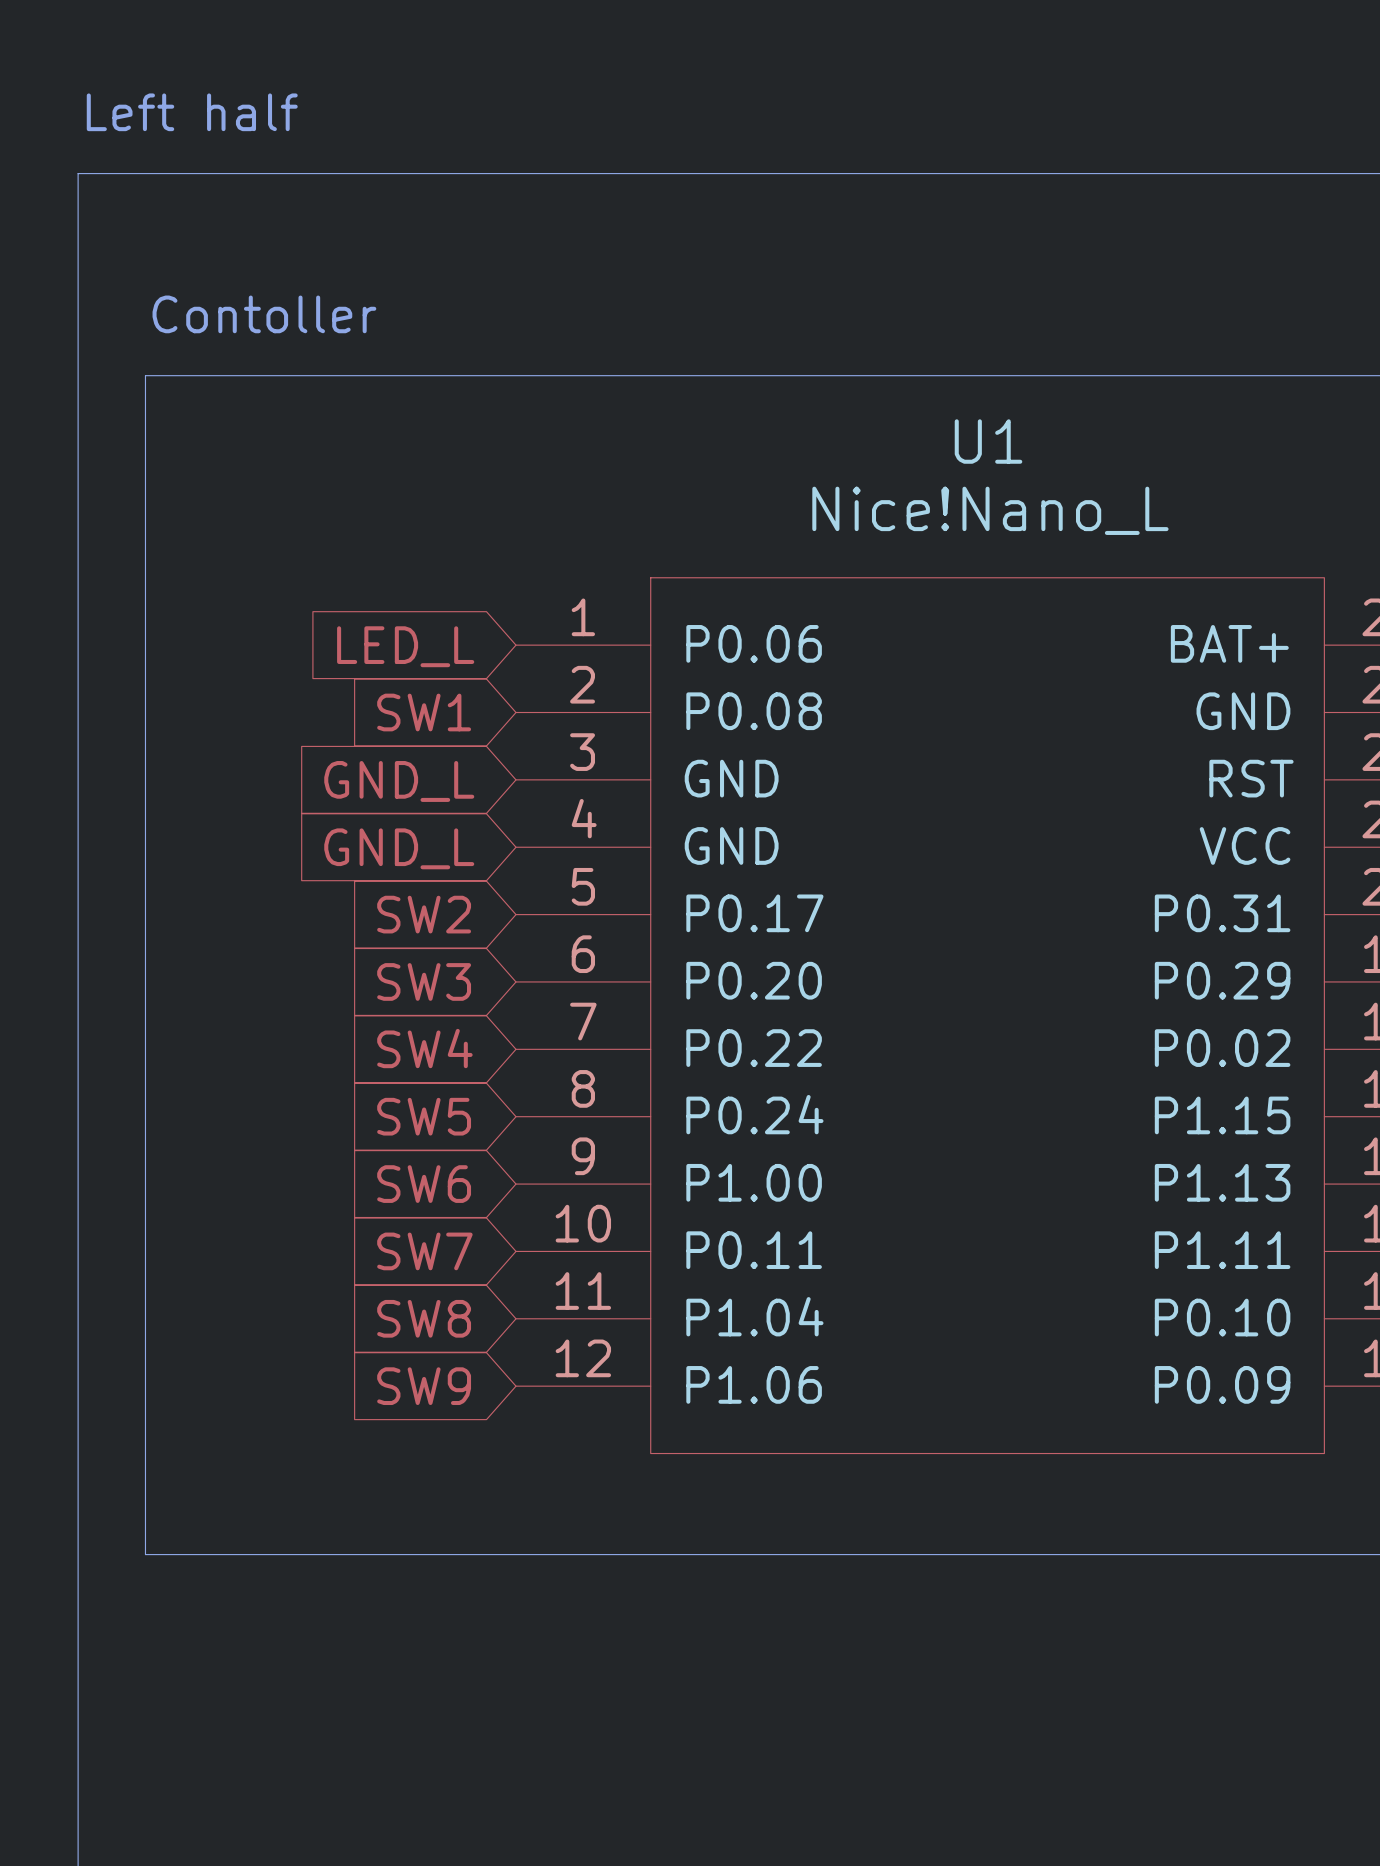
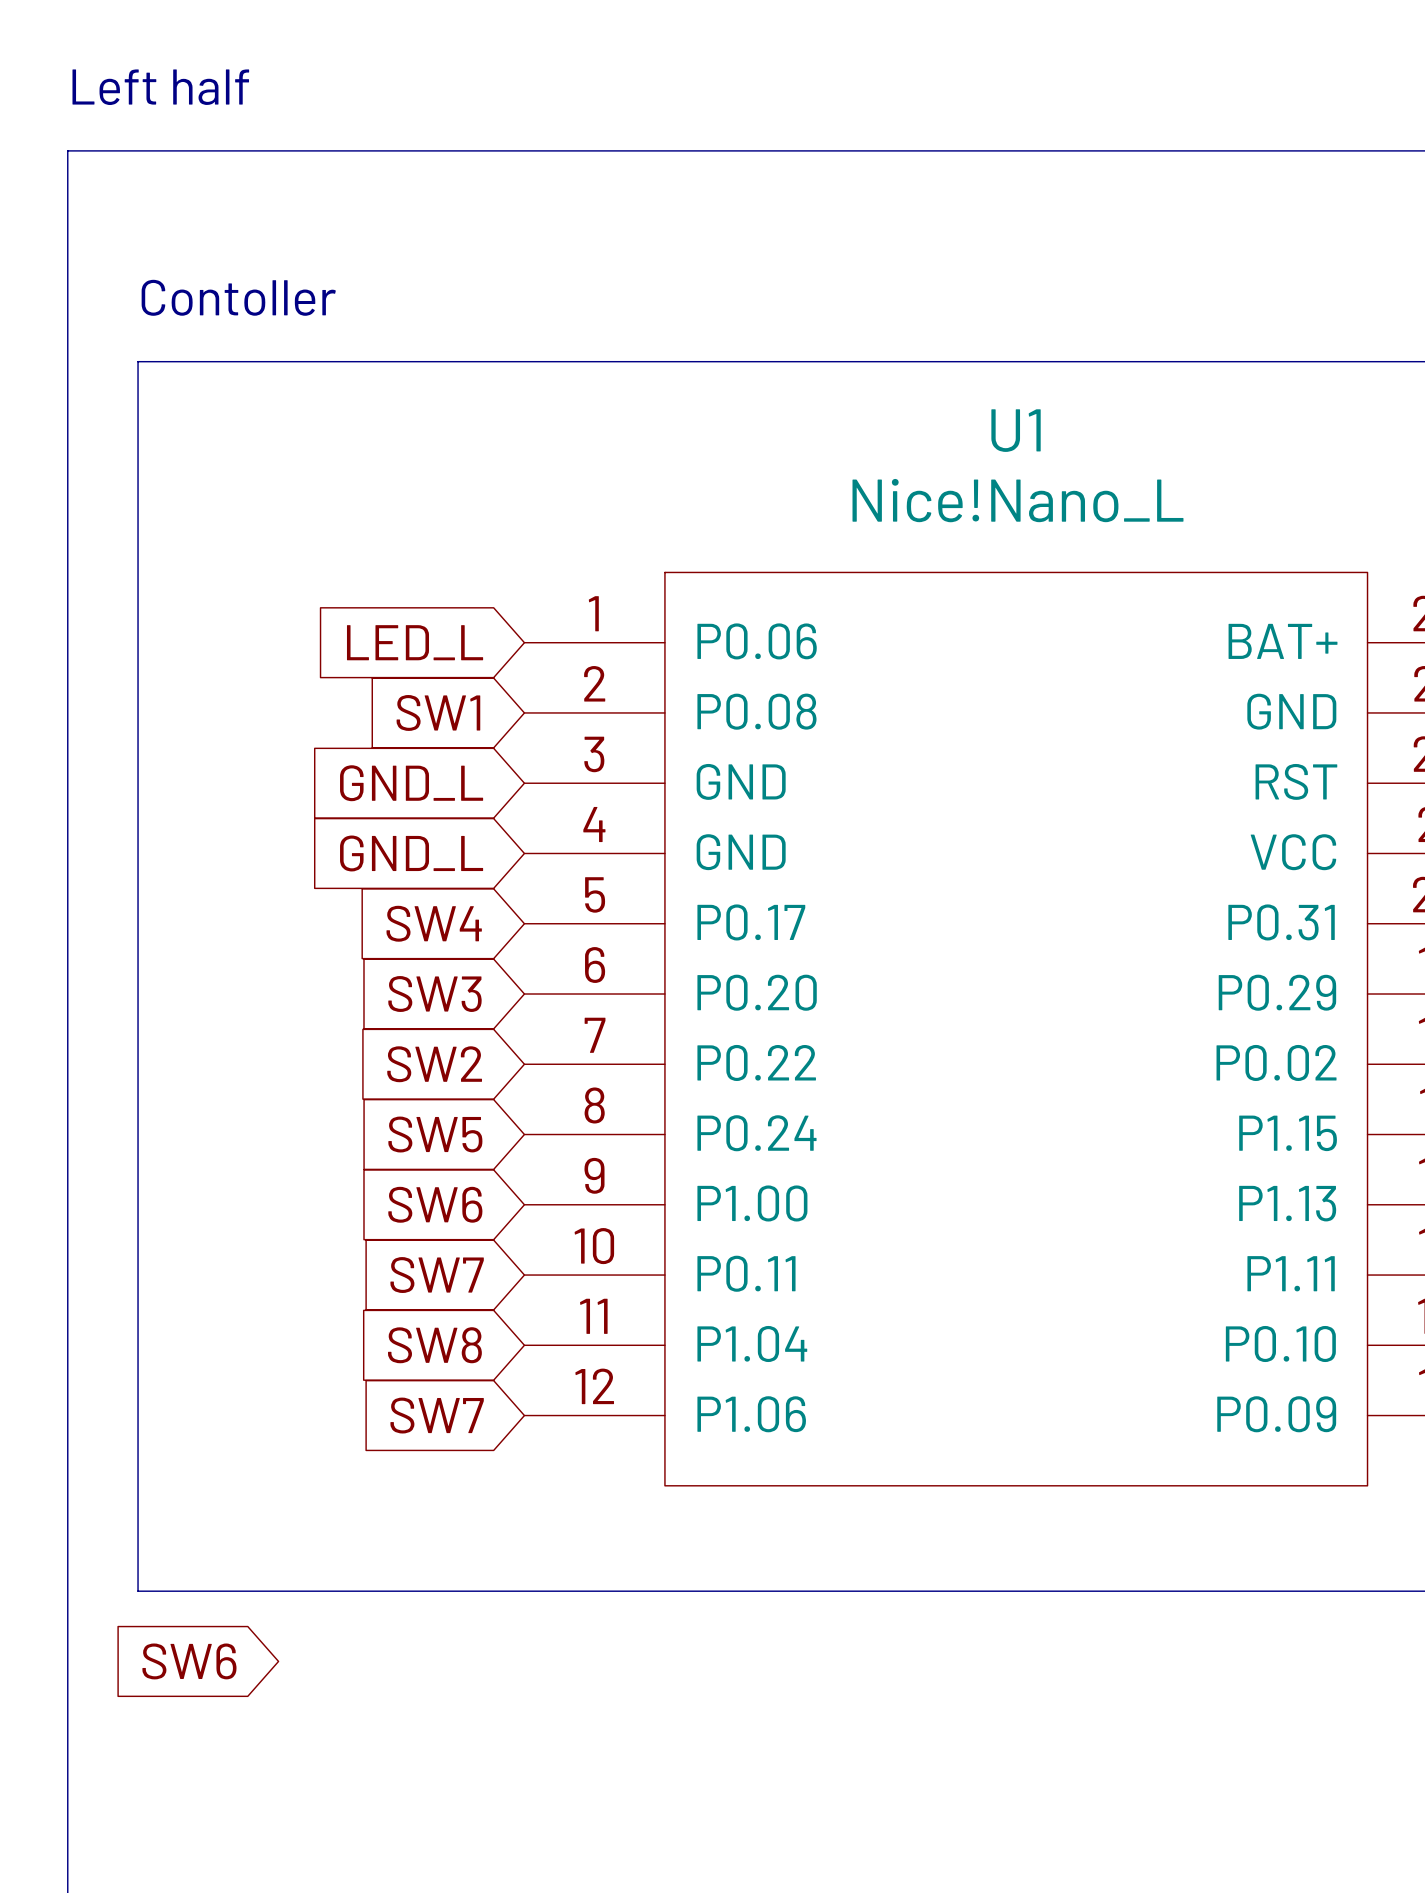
global label: SW2 (424, 914) -> SW4 (434, 923)
global label: SW4 (424, 1048) -> SW2 (434, 1064)
global label: SW9 (424, 1386) -> SW7 (437, 1415)
global label: none -> SW6 (189, 1661)

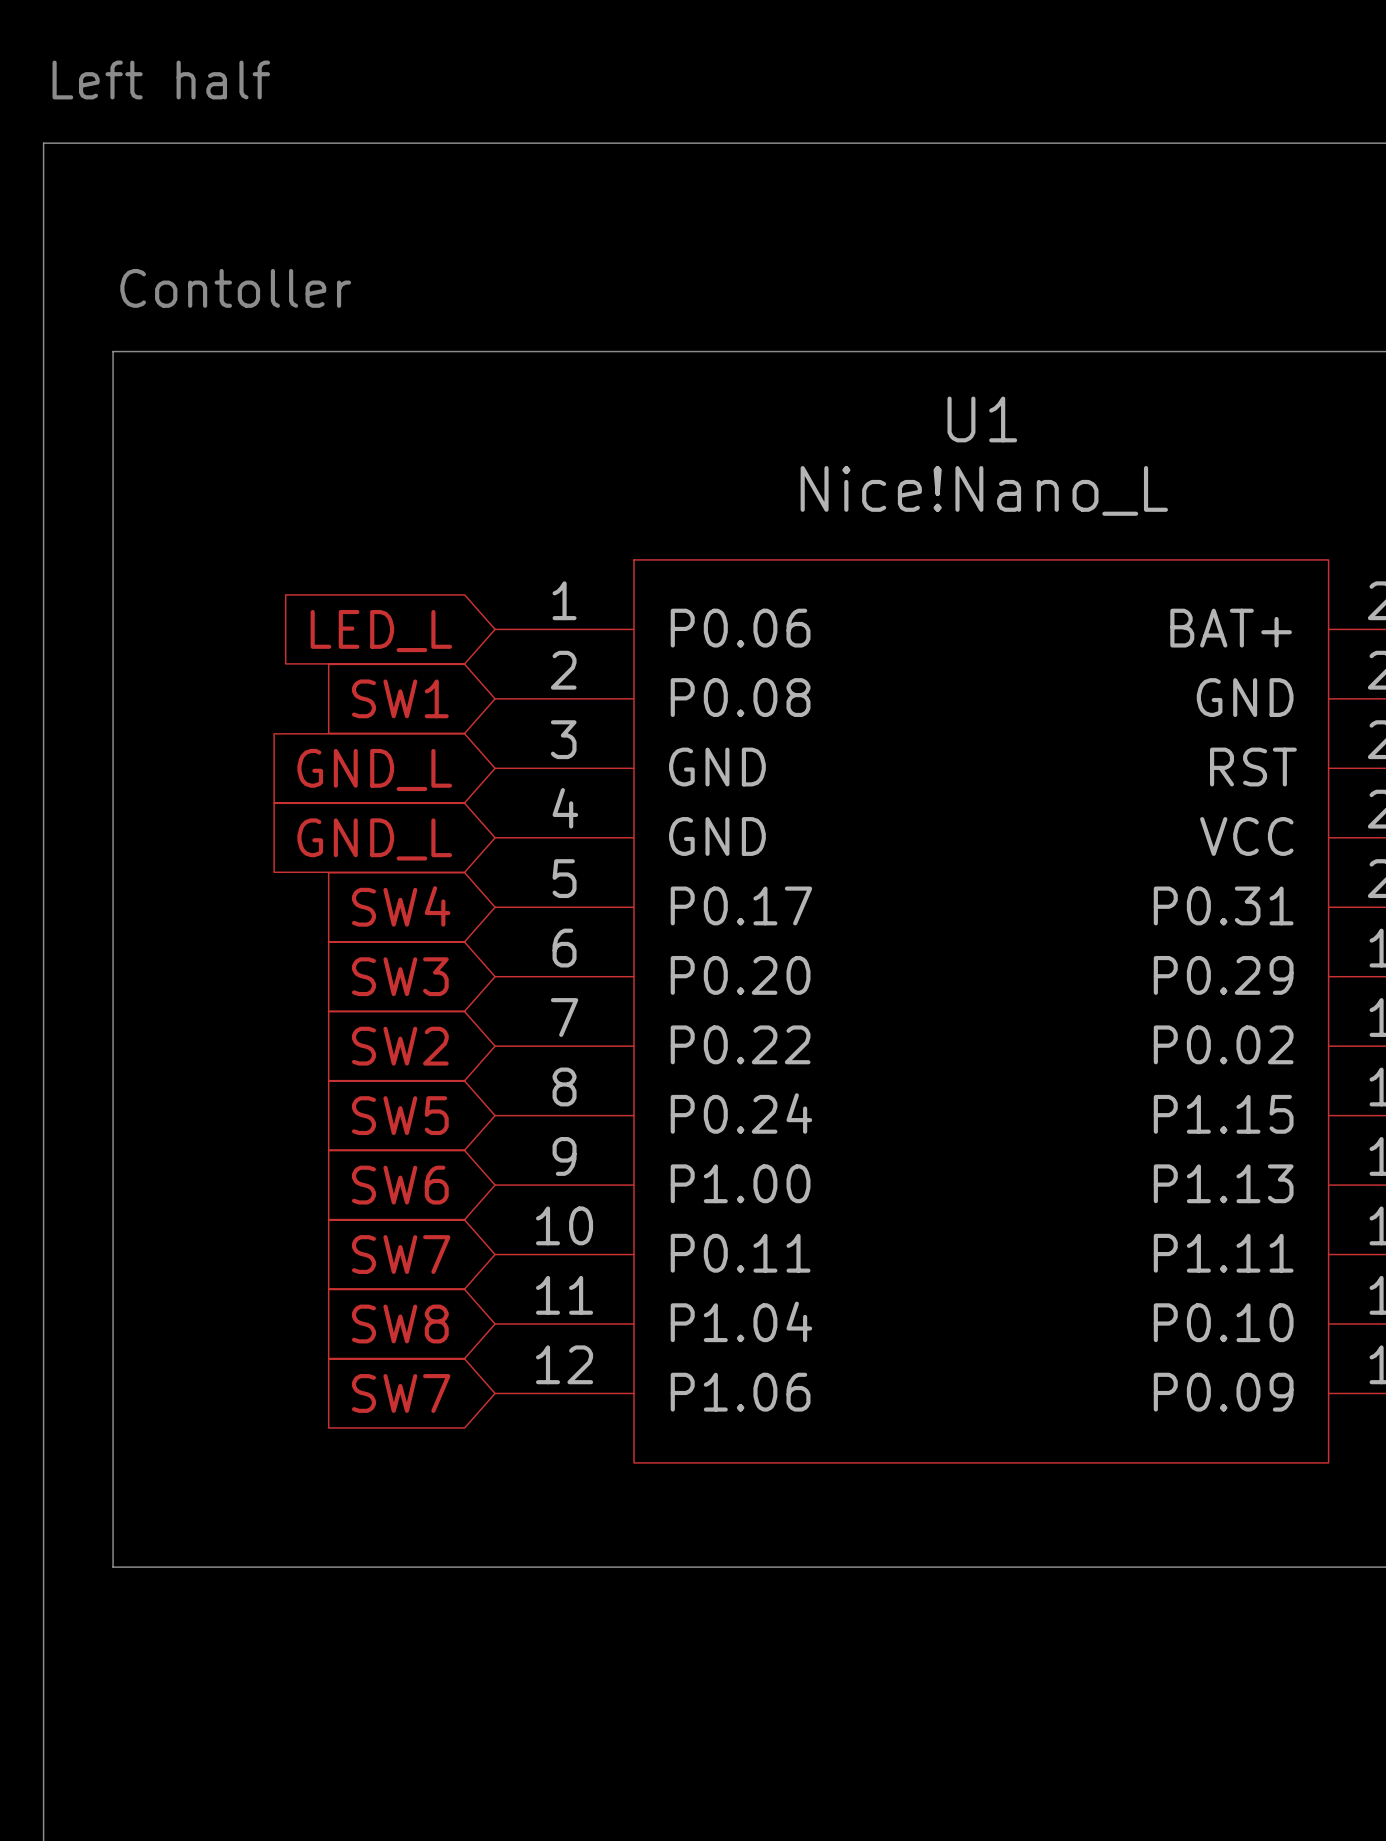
global label: SW6 (189, 1661) -> none

